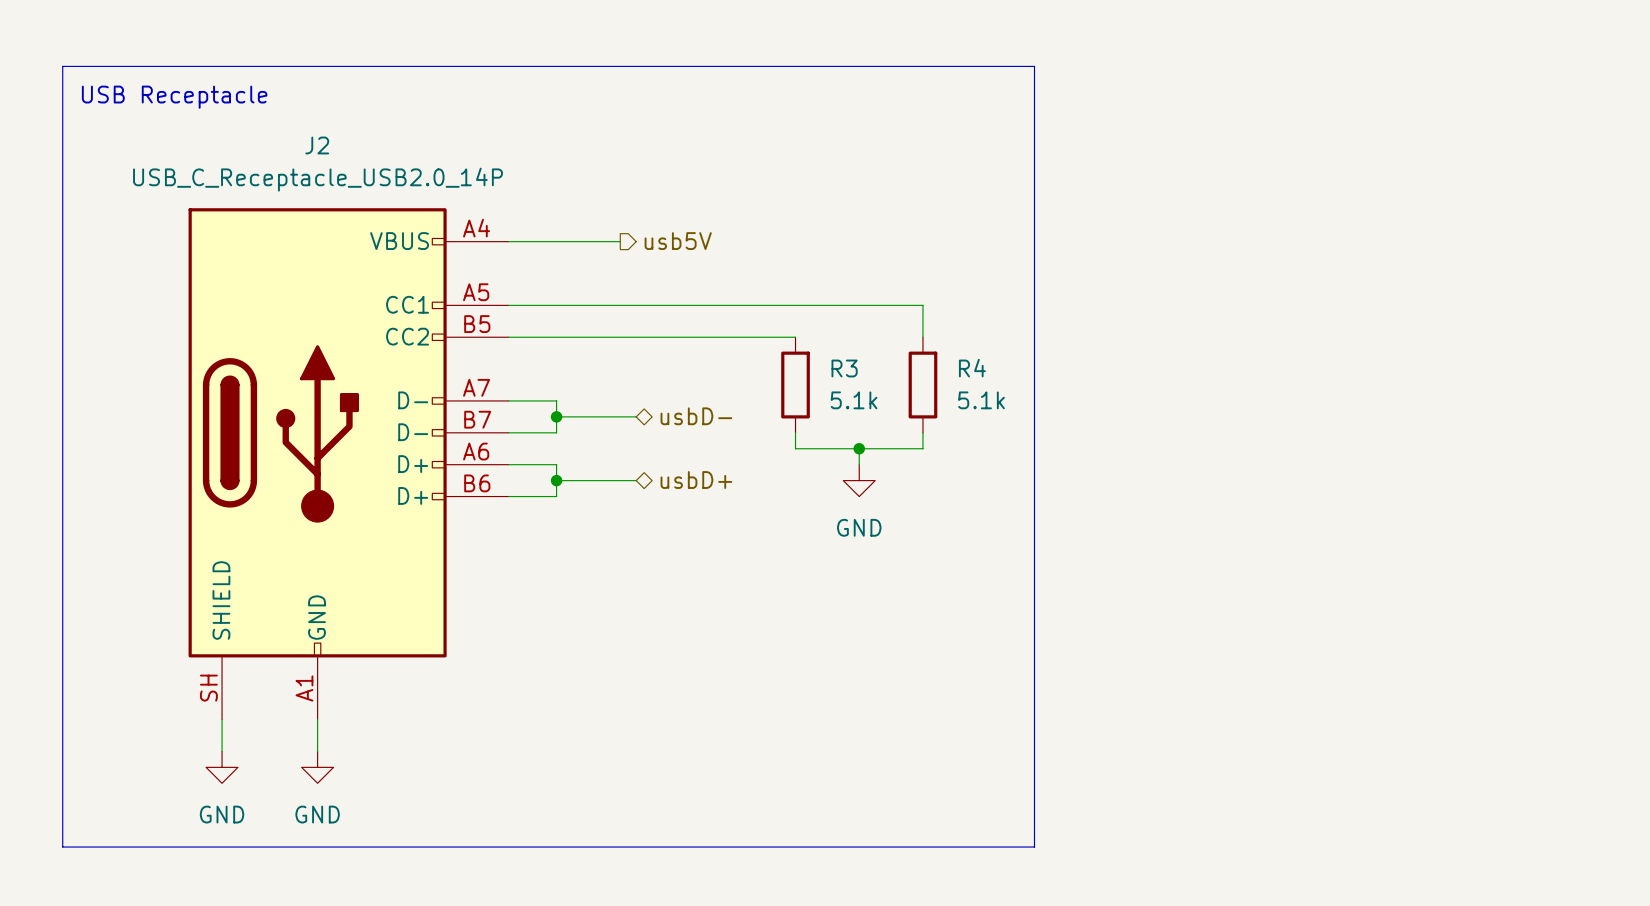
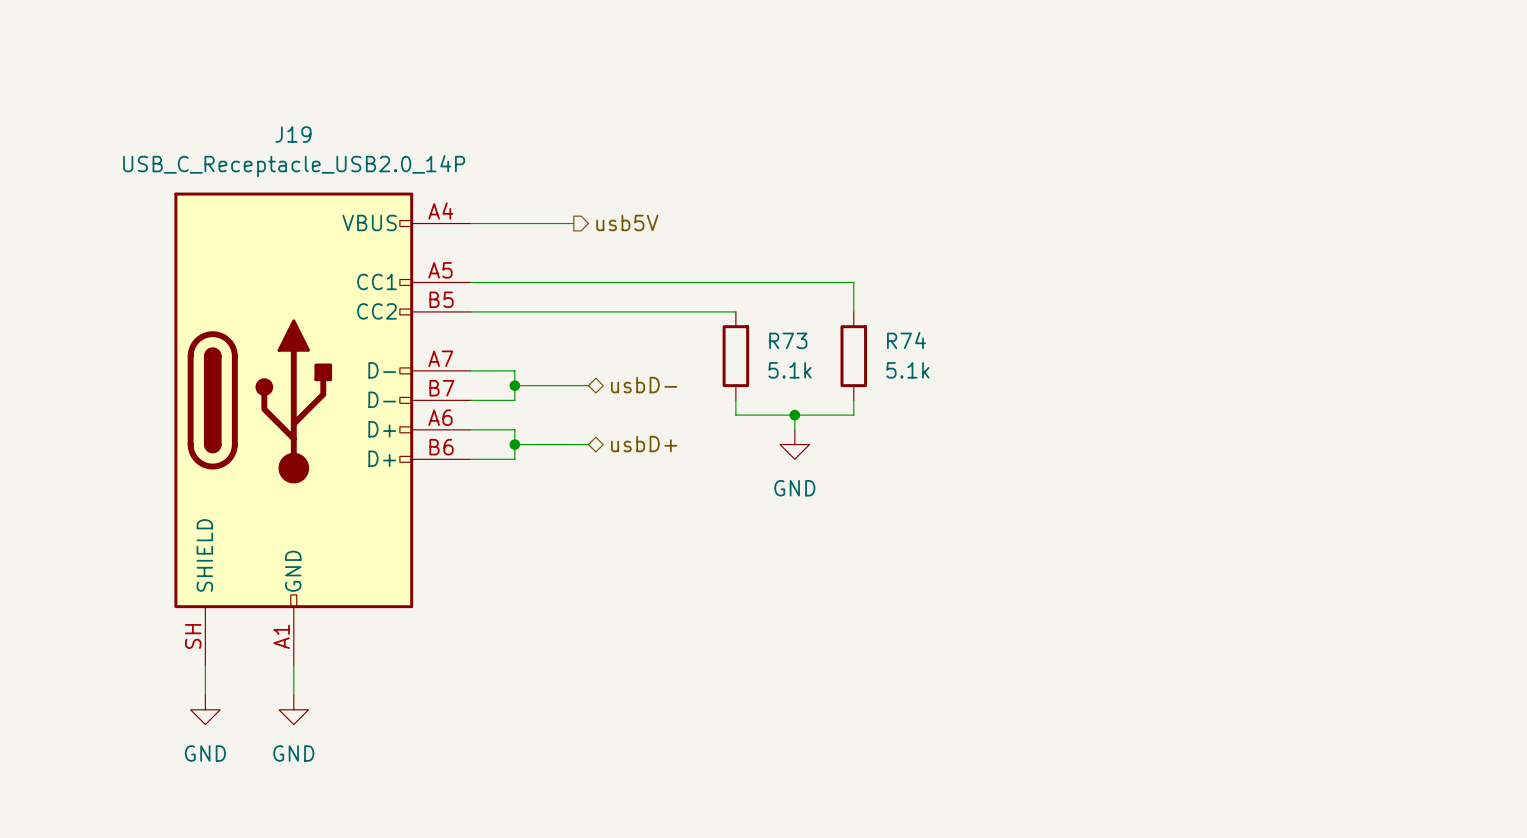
line: (62, 66) (1034, 66) (1034, 847) (62, 847) (62, 66) -> none
text: USB Receptacle (174, 97) -> none
J2 name: J2 (317, 145) -> J19 (293, 134)
R3 name: R3 (844, 368) -> R73 (788, 340)
R4 name: R4 (972, 368) -> R74 (906, 340)

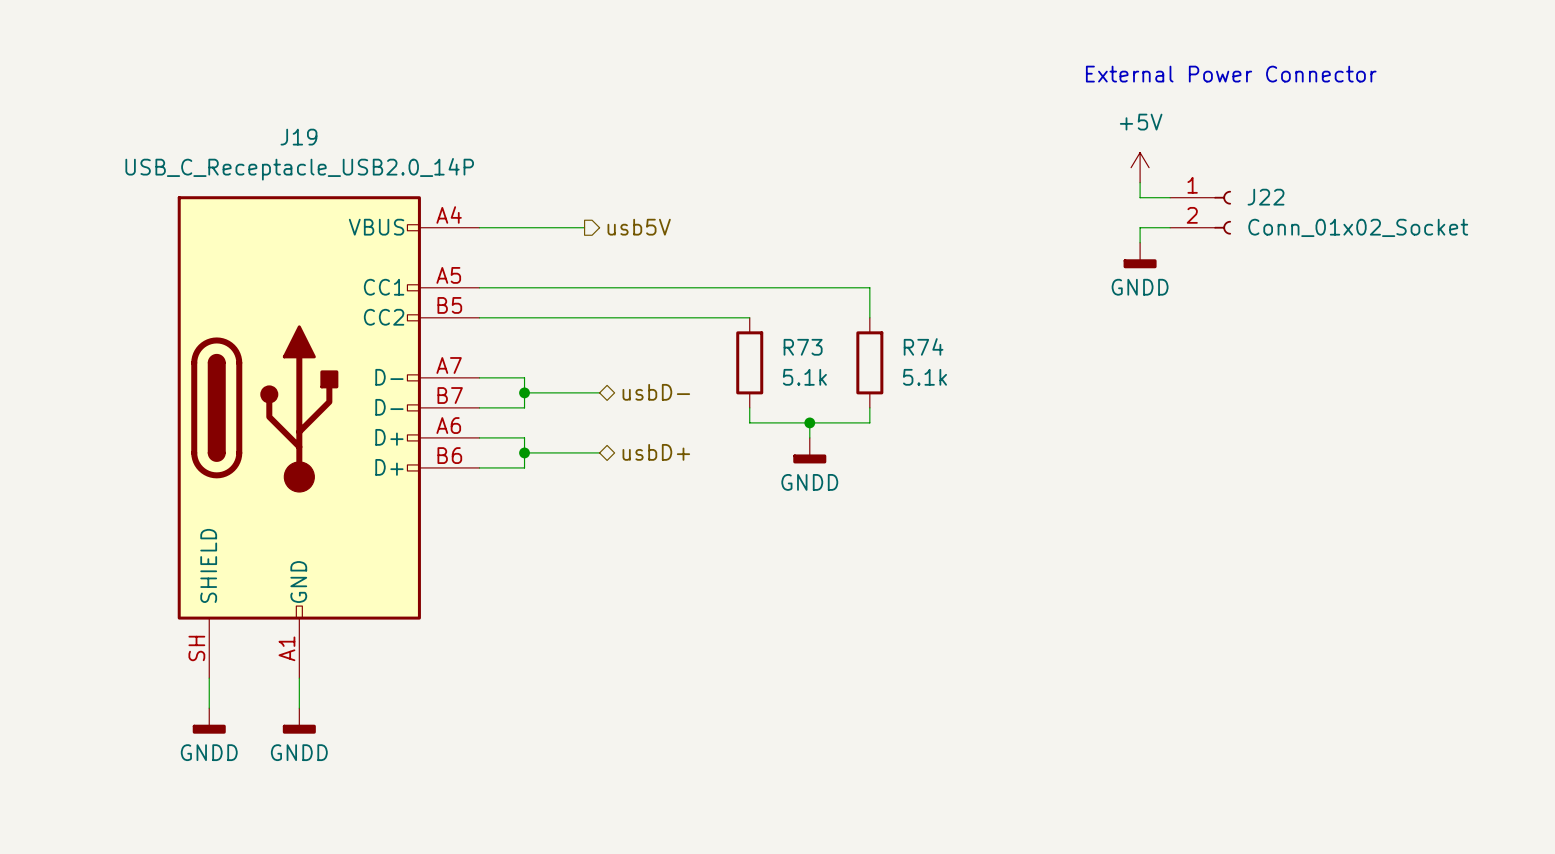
text: none -> External Power Connector (1231, 74)
power symbol: none -> +5V (1140, 167)
wire: none -> (1140, 182) (1140, 197) (1170, 197)
J22: none -> Conn_01x02_Socket (1200, 212)
wire: none -> (1170, 227) (1140, 227) (1140, 242)
power symbol: none -> GNDD (1140, 255)
power symbol: GND (794, 444) -> GNDD (809, 450)
power symbol: GND (205, 709) -> GNDD (209, 720)
power symbol: GND (293, 709) -> GNDD (299, 720)

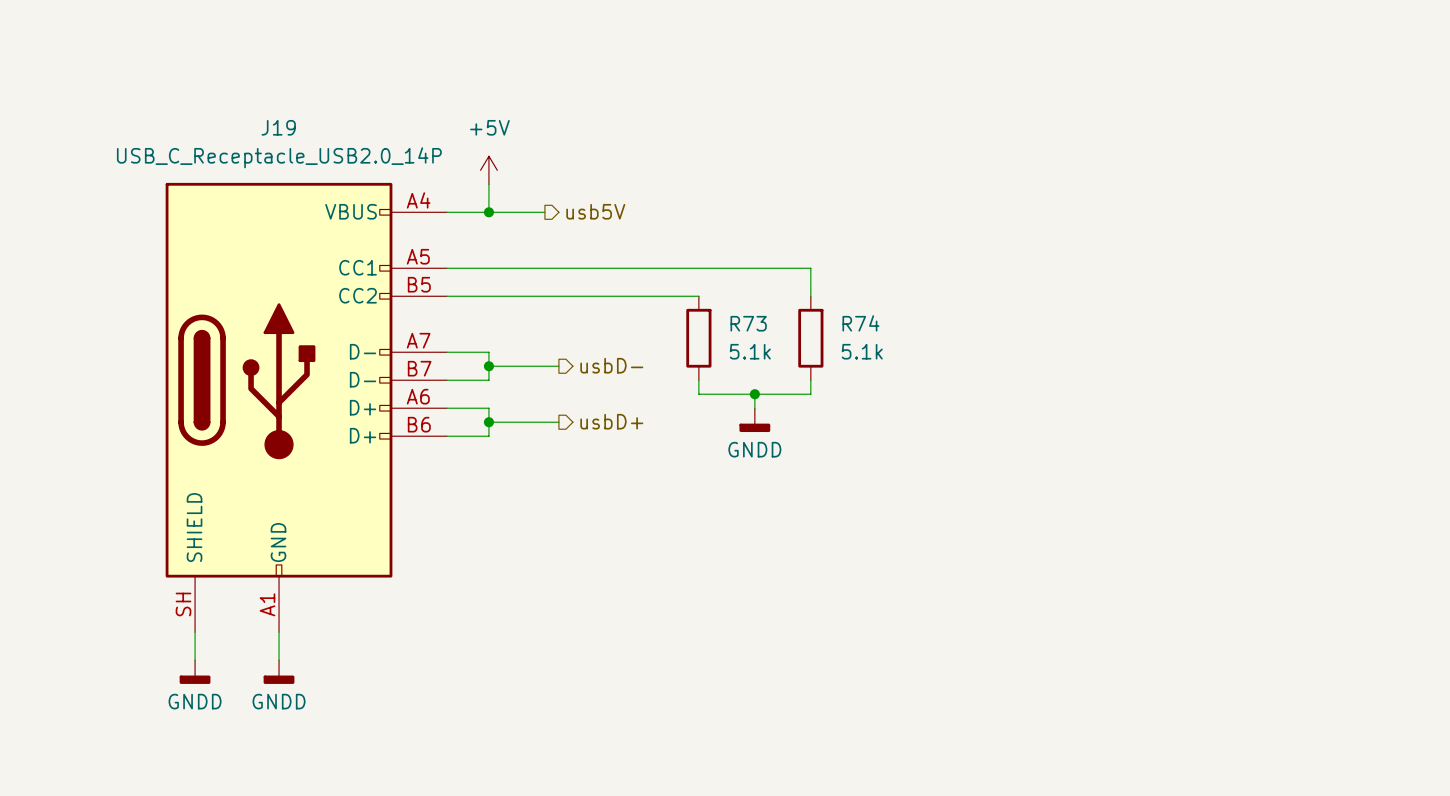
text: External Power Connector (1231, 74) -> none
power symbol: +5V (1140, 167) -> none
power symbol: none -> +5V (488, 170)
wire: (1140, 182) (1140, 197) (1170, 197) -> none
wire: none -> (488, 184) (488, 212)
J22: Conn_01x02_Socket (1200, 212) -> none
junction: none -> (488, 212)
wire: (1170, 227) (1140, 227) (1140, 242) -> none
power symbol: GNDD (1140, 255) -> none
hierarchical label shape: bidirectional (656, 392) -> output (611, 365)
hierarchical label shape: bidirectional (656, 452) -> output (611, 421)

